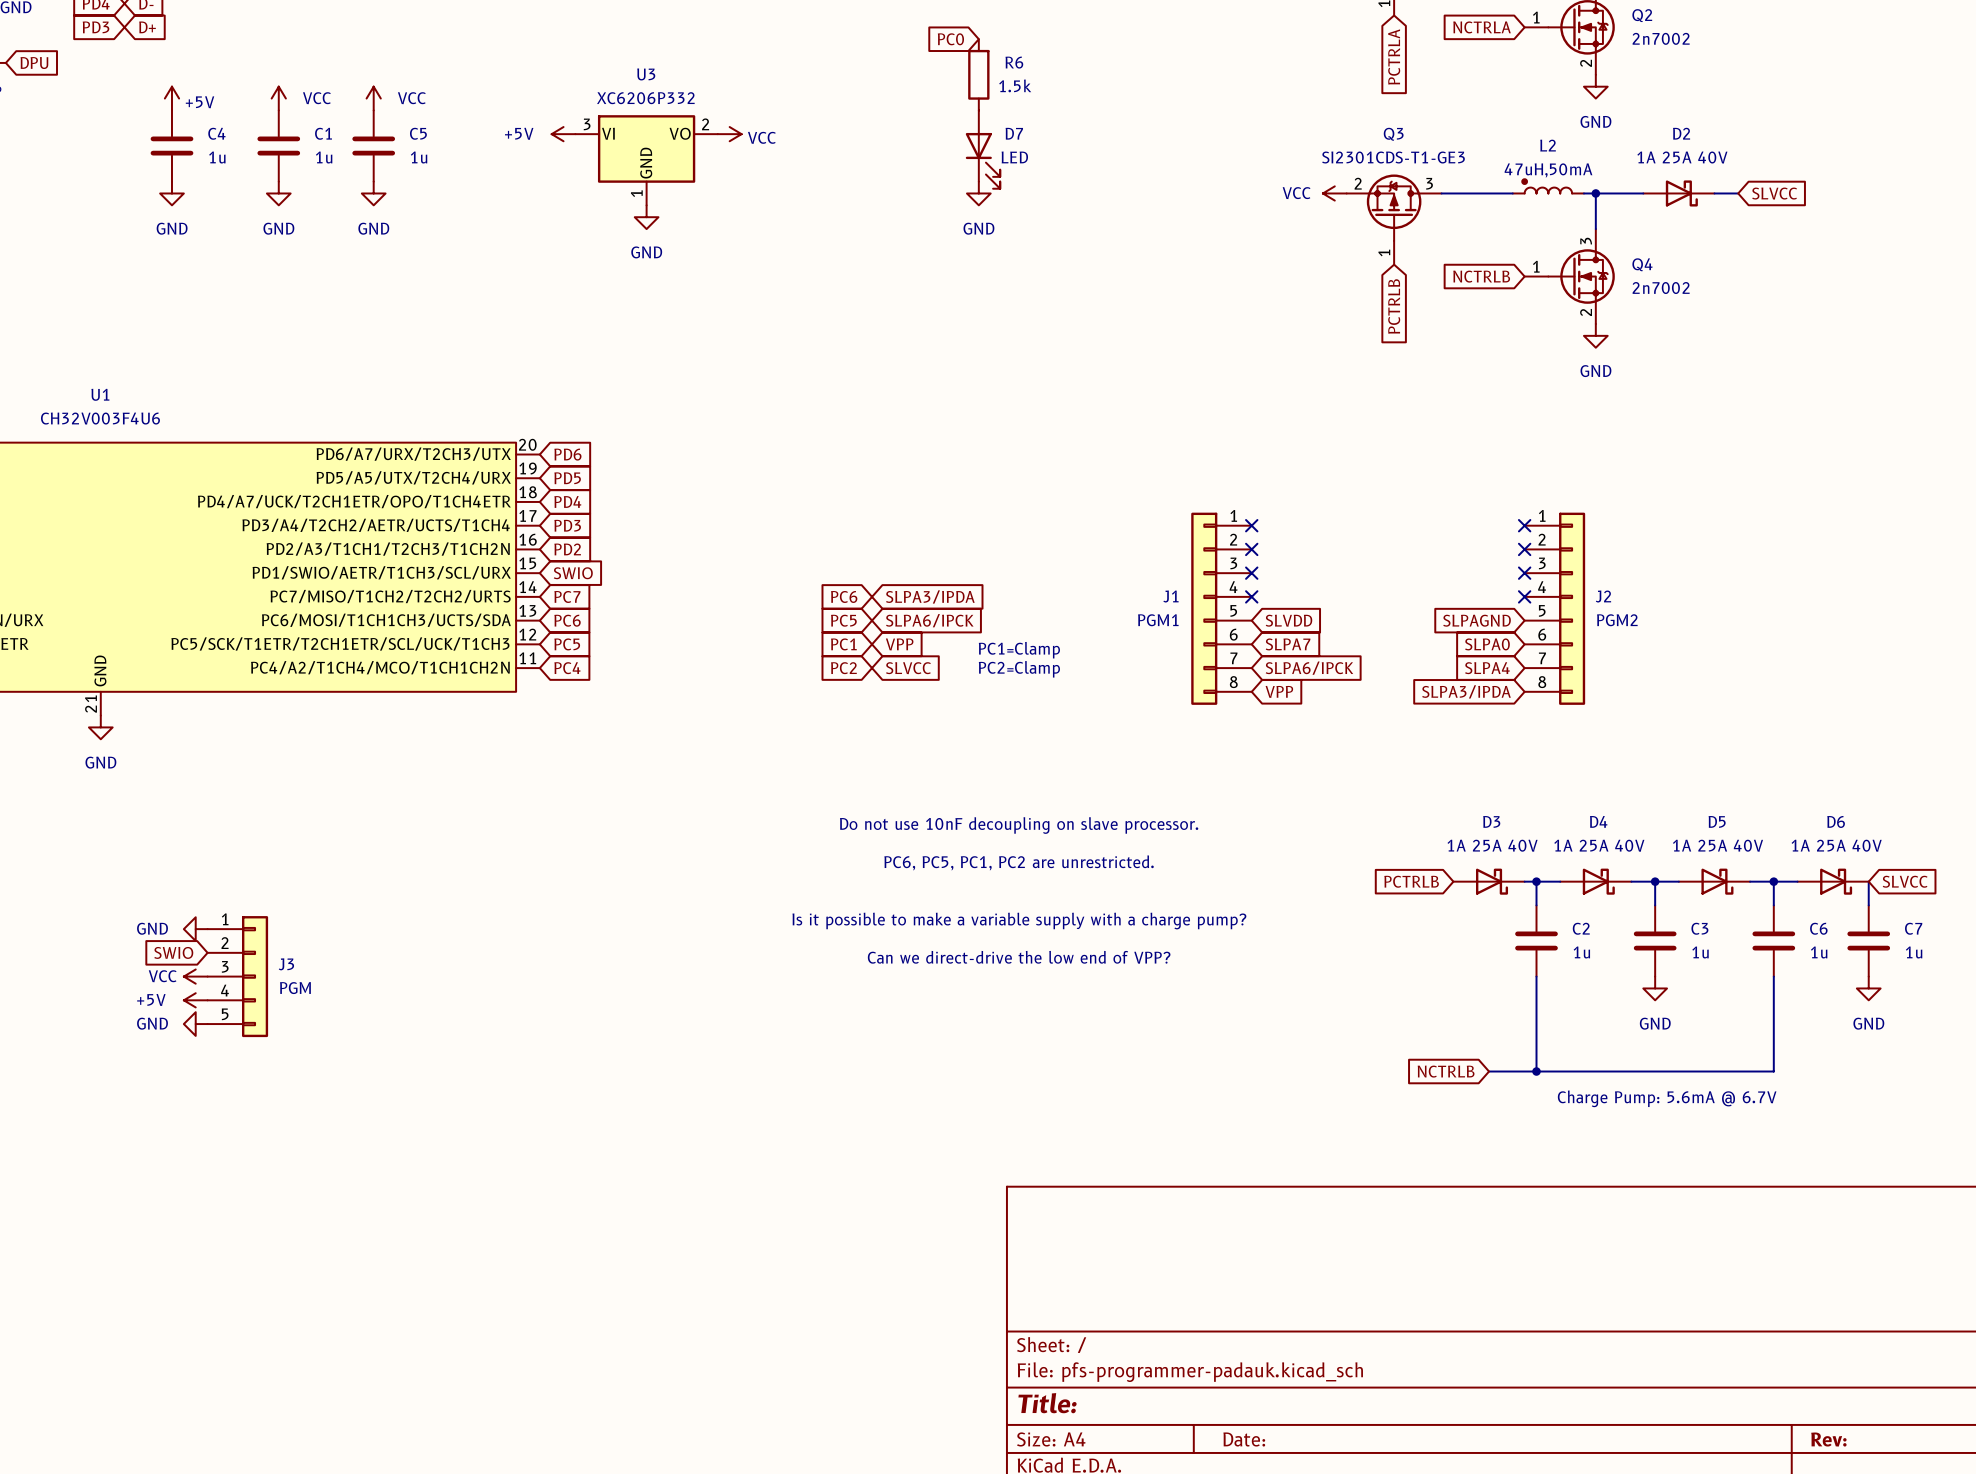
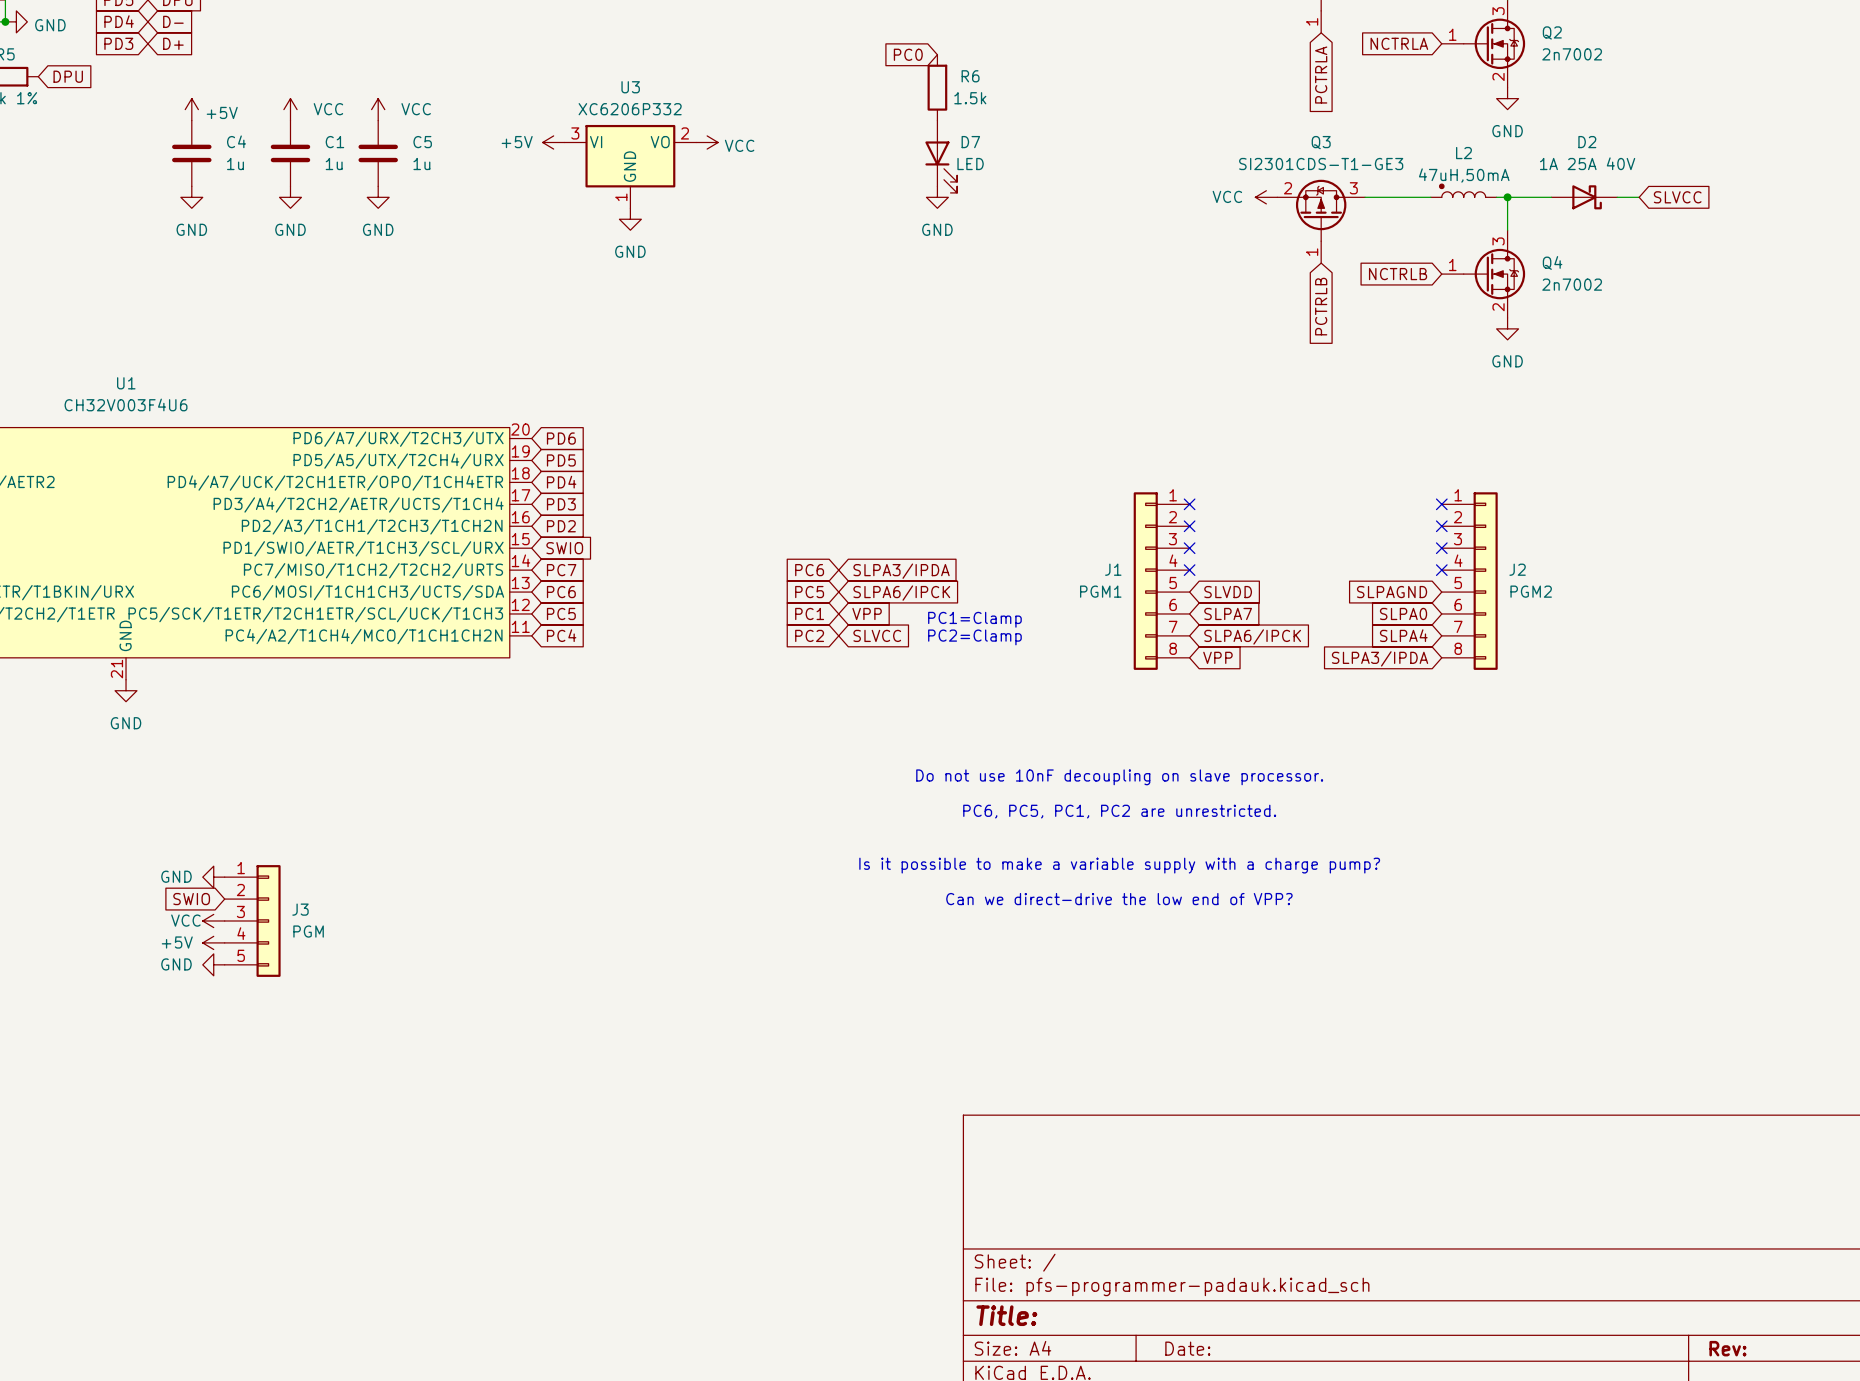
text position: Do not use 10nF decoupling on slave processor. (1019, 825) -> Do not use 10nF decoupling on slave processor. (1119, 777)
text position: PC6, PC5, PC1, PC2 are unrestricted. (1019, 862) -> PC6, PC5, PC1, PC2 are unrestricted. (1119, 811)
global label: PCTRLB (1411, 881) -> none
D3: 1A 25A 40V (1489, 881) -> none
wire: (1524, 881) (1560, 881) -> none
wire: (1536, 881) (1536, 905) -> none
junction: (1536, 881) -> none
D4: 1A 25A 40V (1595, 881) -> none
wire: (1631, 881) (1678, 881) -> none
wire: (1655, 881) (1655, 905) -> none
junction: (1655, 881) -> none
D5: 1A 25A 40V (1714, 881) -> none
wire: (1750, 881) (1797, 881) -> none
wire: (1773, 881) (1773, 905) -> none
junction: (1773, 881) -> none
D6: 1A 25A 40V (1833, 881) -> none
wire: (1868, 881) (1868, 905) -> none
global label: SLVCC (1905, 881) -> none
text position: Is it possible to make a variable supply with a charge pump? (1019, 921) -> Is it possible to make a variable supply with a charge pump? (1119, 865)
C2: 1u (1536, 940) -> none
C3: 1u (1655, 940) -> none
C6: 1u (1773, 940) -> none
C7: 1u (1868, 940) -> none
text position: Can we direct-drive the low end of VPP? (1019, 957) -> Can we direct-drive the low end of VPP? (1119, 899)
wire: (1536, 976) (1536, 1071) -> none
wire: (1773, 976) (1773, 1071) (1489, 1071) -> none
power symbol: GND (1655, 988) -> none
power symbol: GND (1868, 988) -> none
global label: NCTRLB (1446, 1071) -> none
junction: (1536, 1071) -> none
text: Charge Pump: 5.6mA @ 6.7V (1667, 1098) -> none

